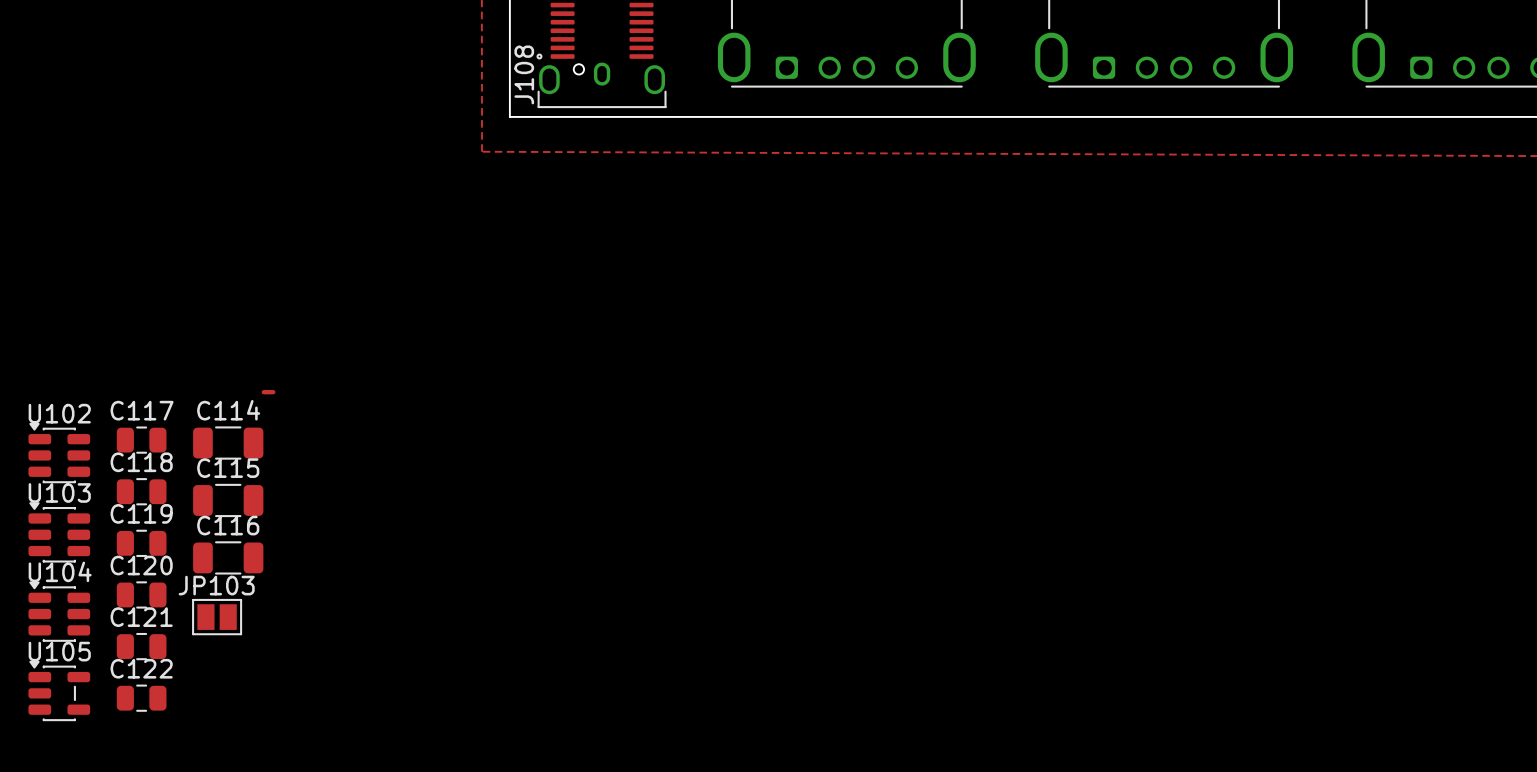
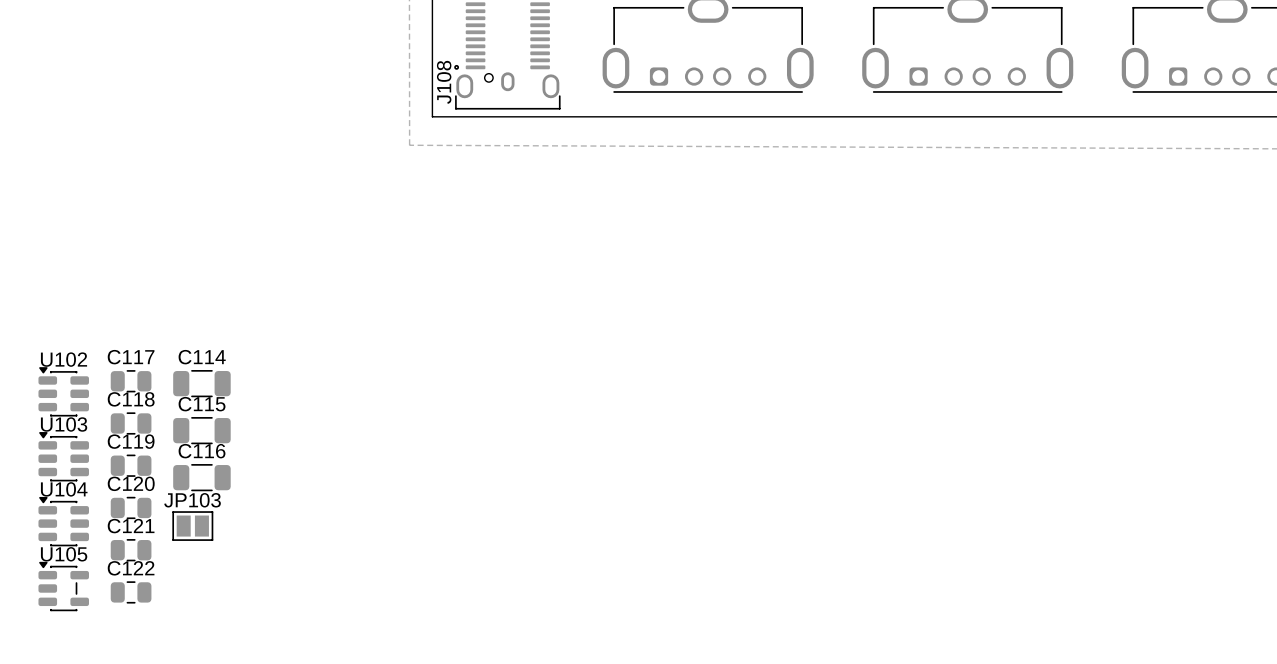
track: (263, 392) (273, 392) -> none

